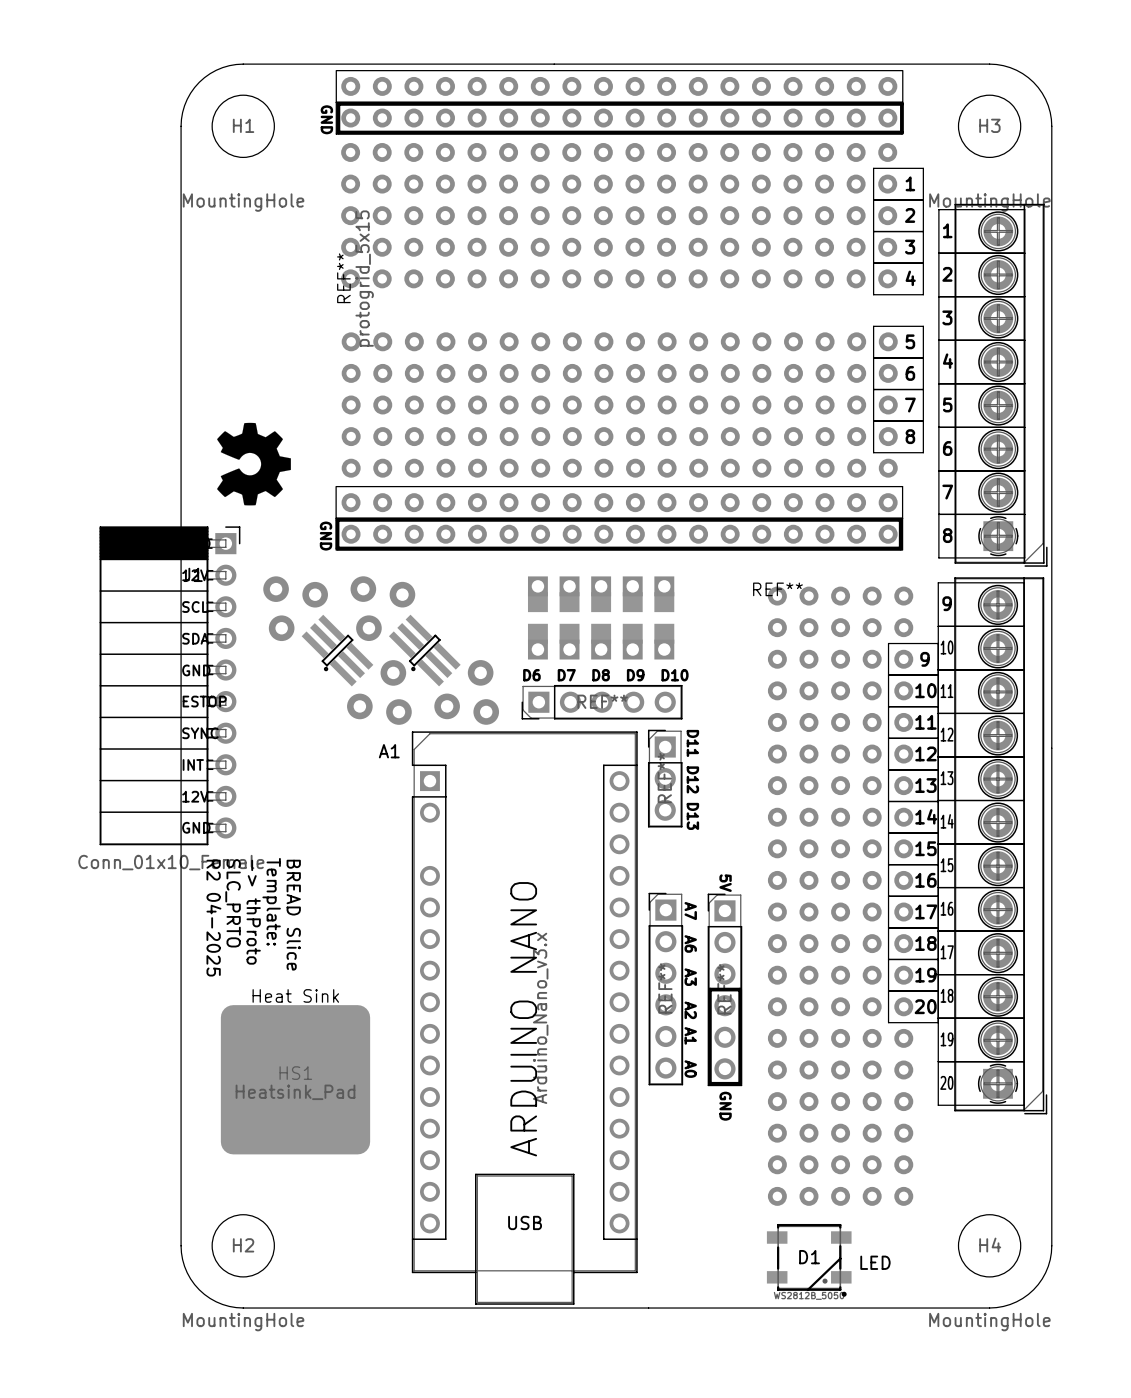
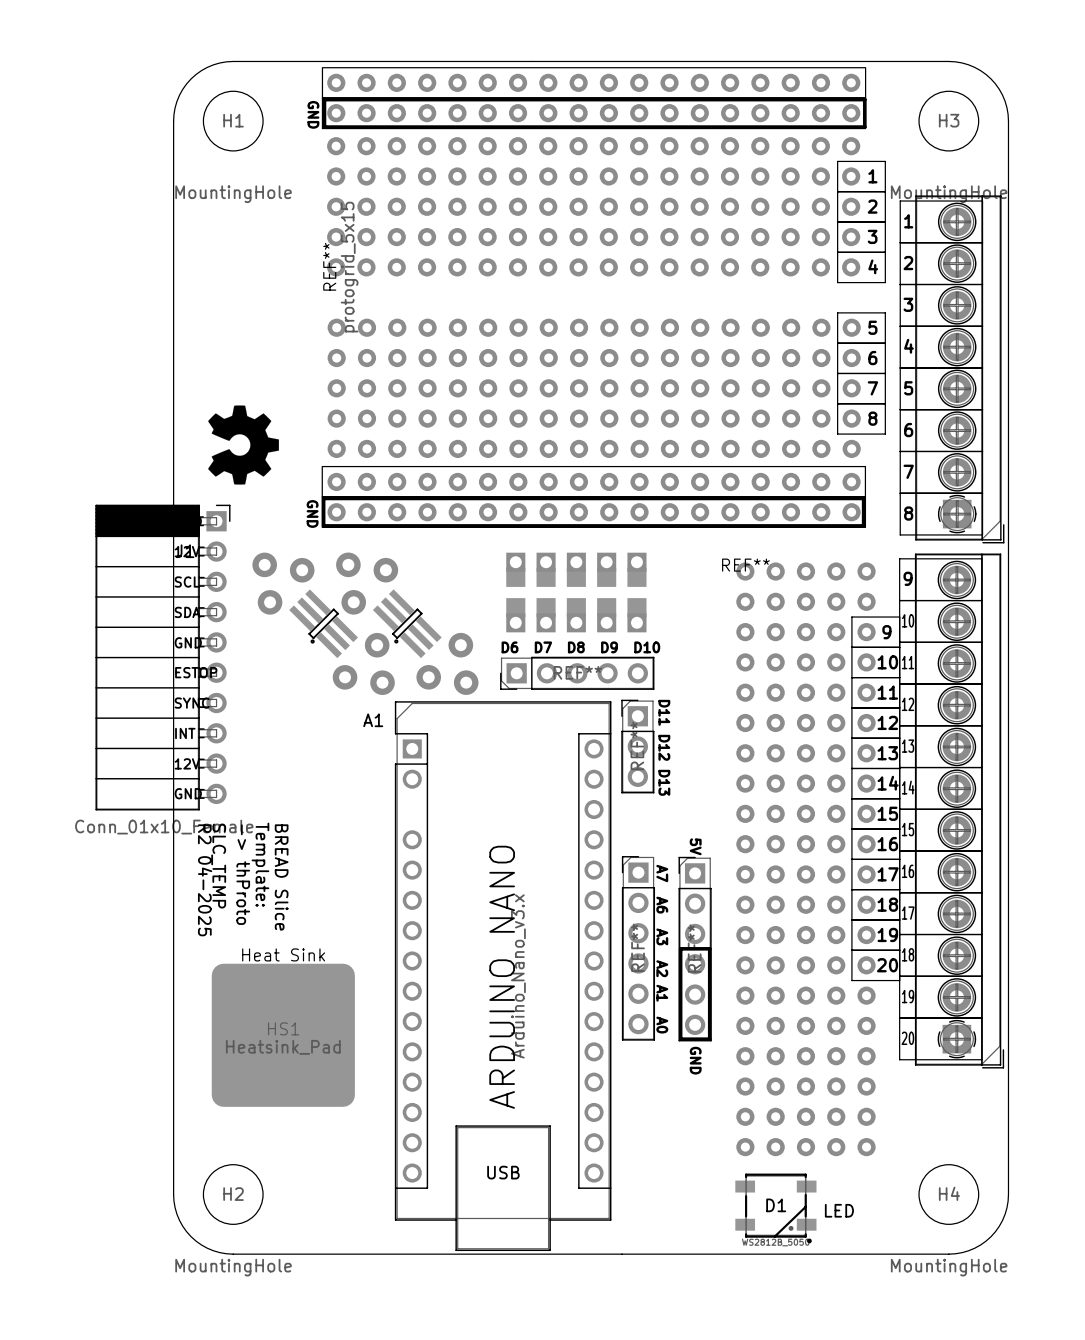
text: SLC_PRTO (233, 903) -> SLC_TEMP (218, 866)

